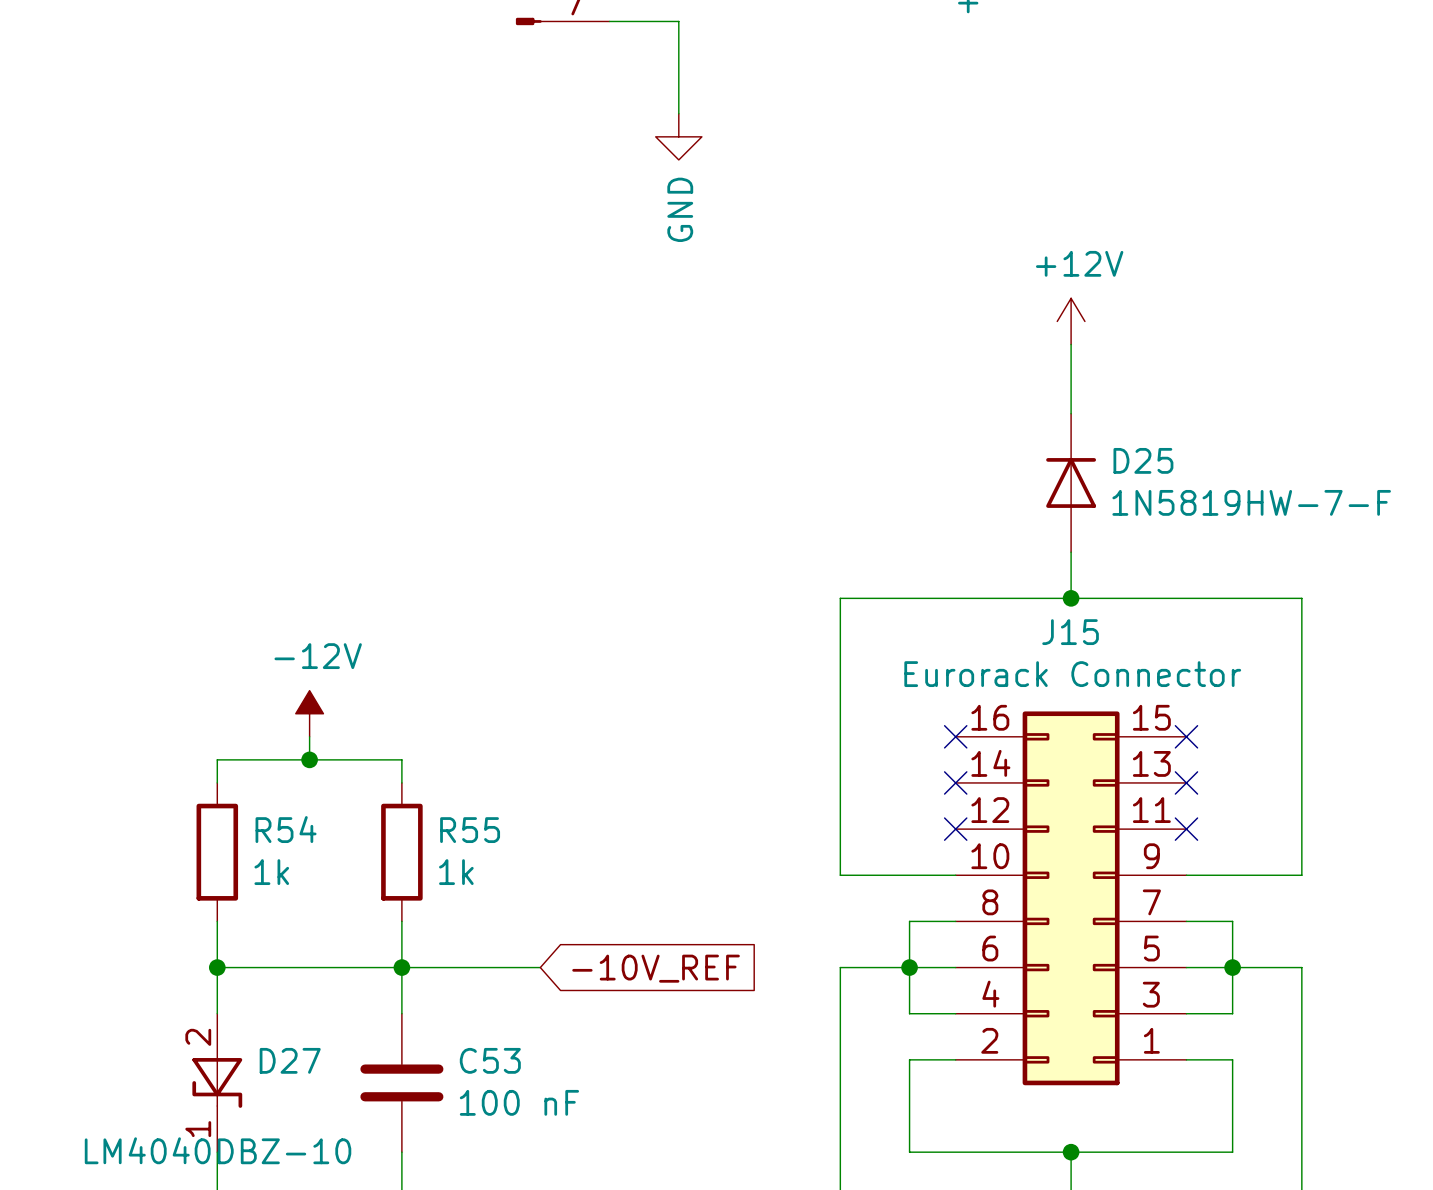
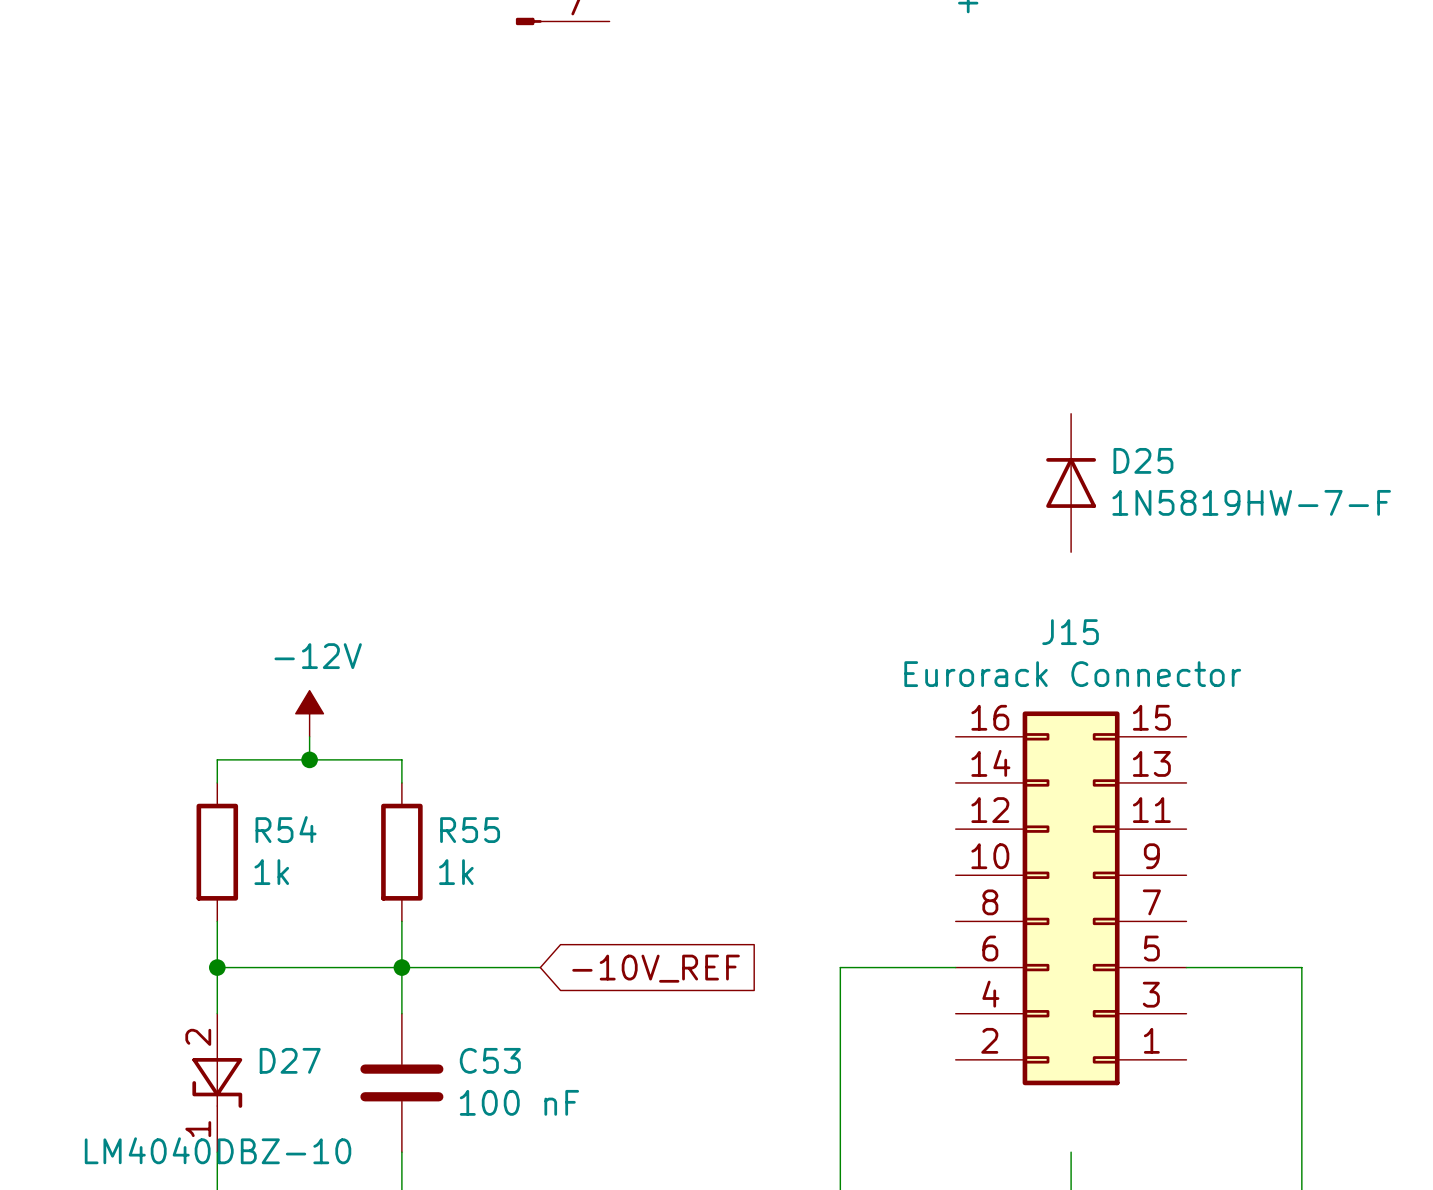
wire: (609, 21) (678, 21) (678, 113) -> none
power symbol: GND (678, 136) -> none
power symbol: +12V (1071, 321) -> none
wire: (1071, 344) (1071, 413) -> none
wire: (1071, 552) (1071, 598) -> none
junction: (1071, 598) -> none
no-connect mark: (955, 736) -> none
no-connect mark: (1186, 736) -> none
no-connect mark: (955, 782) -> none
no-connect mark: (1186, 782) -> none
no-connect mark: (955, 829) -> none
no-connect mark: (1186, 829) -> none
wire: (955, 875) (840, 875) (840, 598) (1301, 598) (1301, 875) (1186, 875) -> none
wire: (955, 921) (909, 921) (909, 1013) (955, 1013) -> none
wire: (1186, 921) (1232, 921) (1232, 1013) (1186, 1013) -> none
junction: (909, 967) -> none
junction: (1232, 967) -> none
wire: (955, 1059) (909, 1059) (909, 1152) (1232, 1152) (1232, 1059) (1186, 1059) -> none
junction: (1071, 1152) -> none

